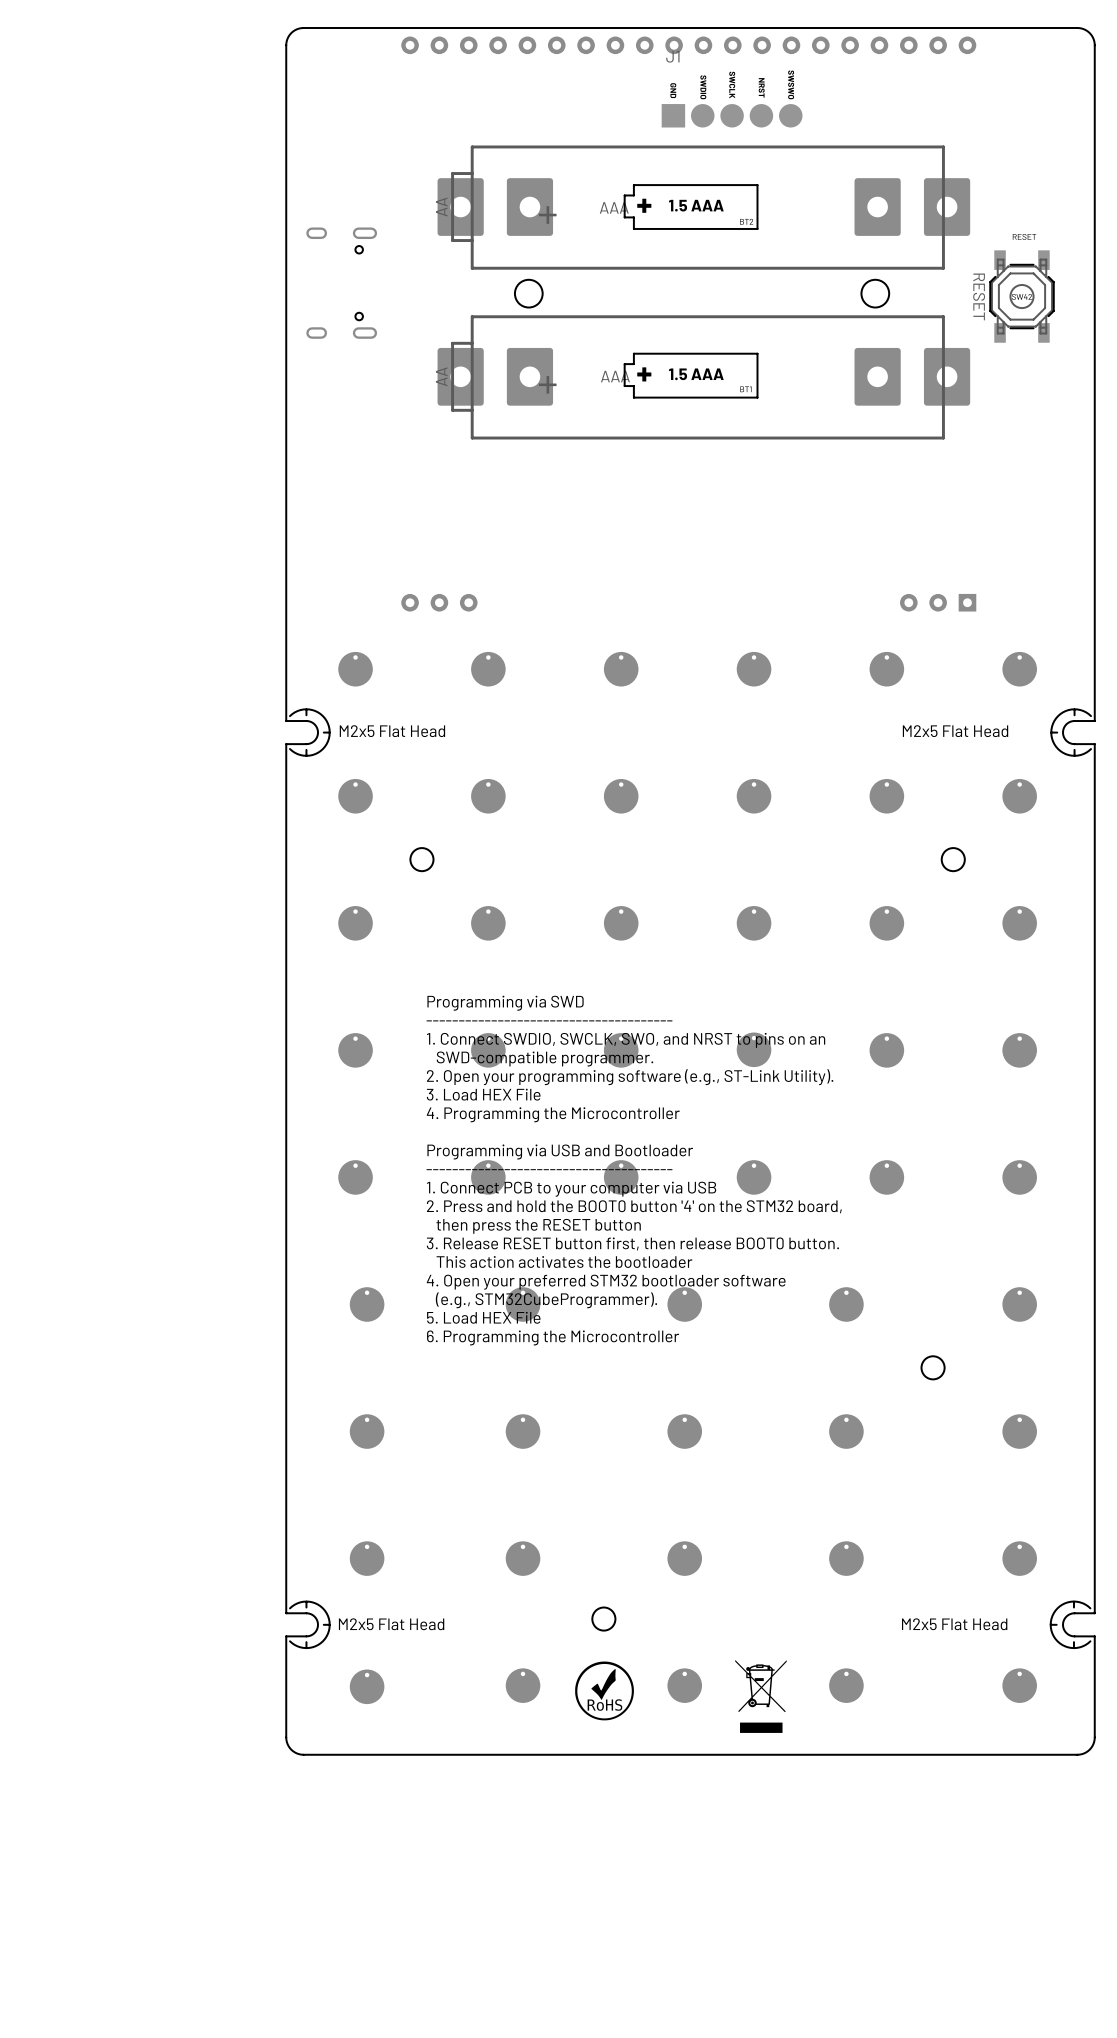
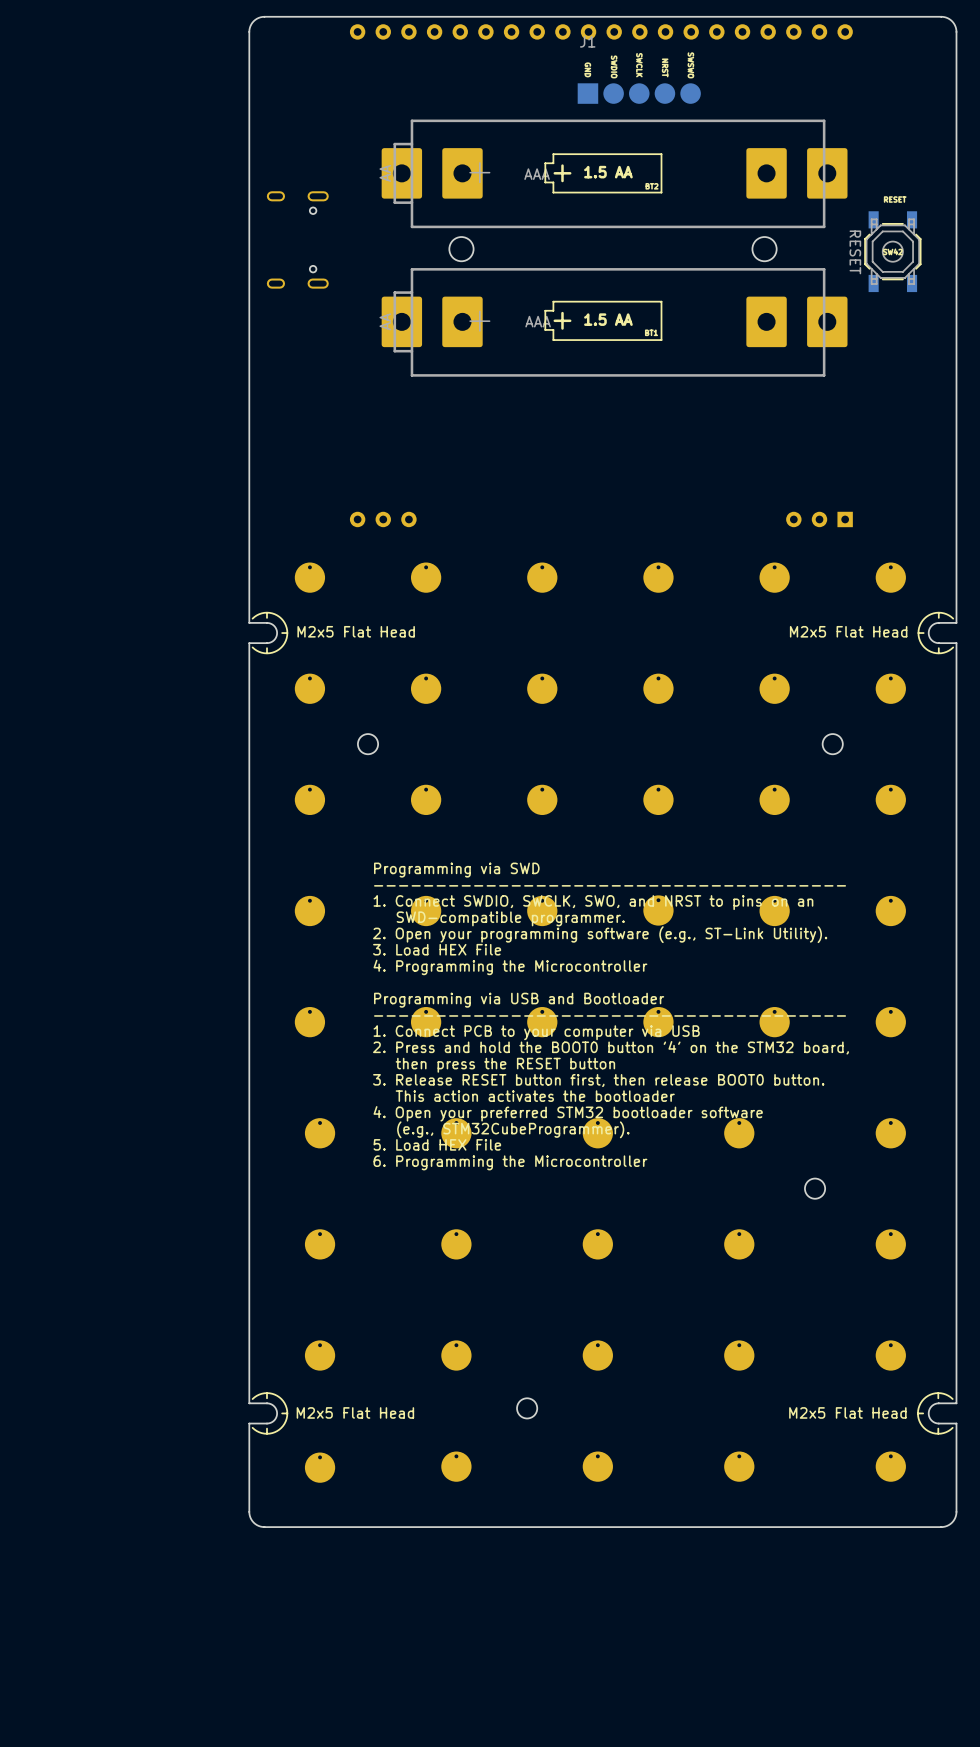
text: 1.5 AAA (696, 205) -> 1.5 AA (608, 172)
text: 1.5 AAA (696, 374) -> 1.5 AA (608, 319)
drawing: [735, 1659, 787, 1733] -> none
drawing: [575, 1661, 634, 1721] -> none

